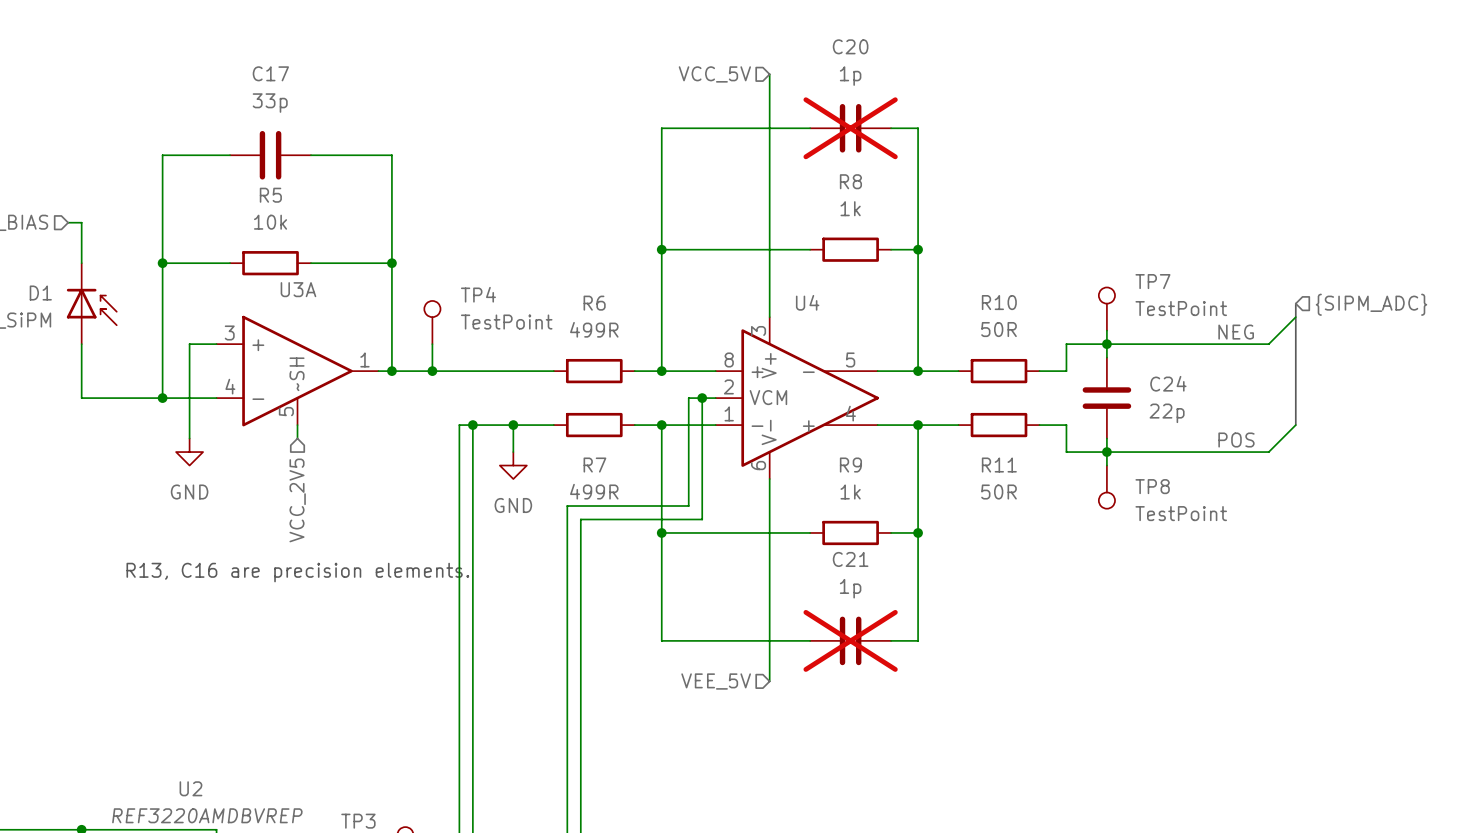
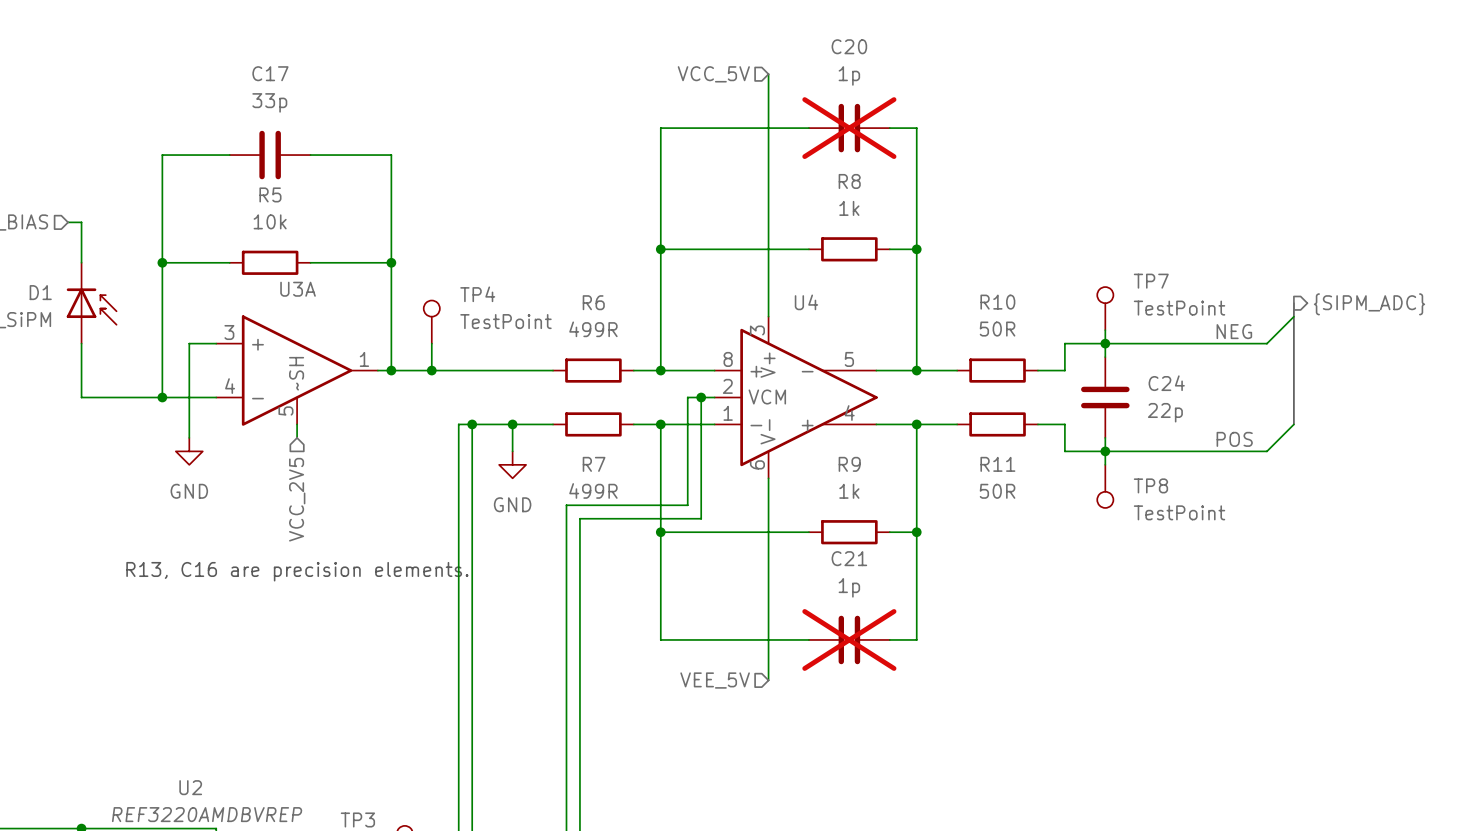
hierarchical label shape: input (1371, 304) -> output (1369, 304)

